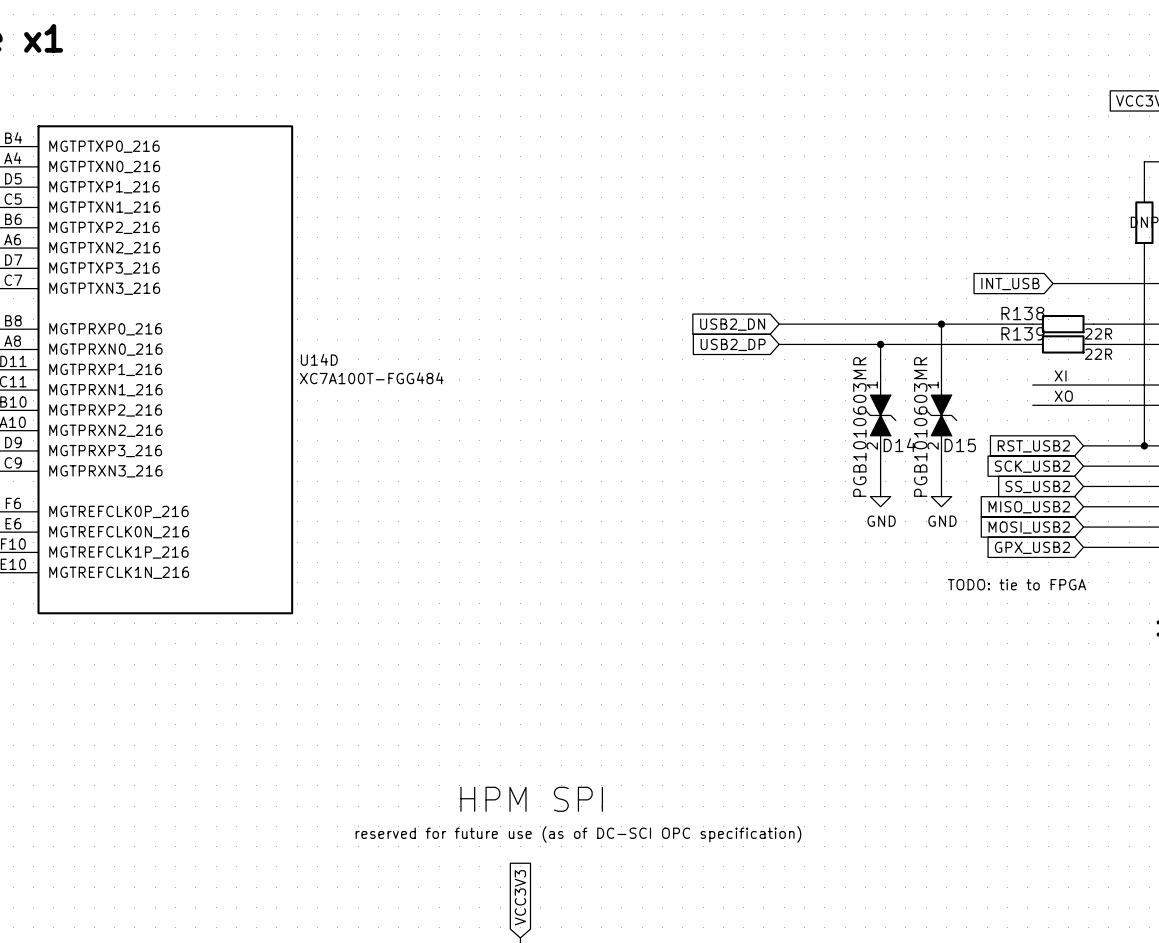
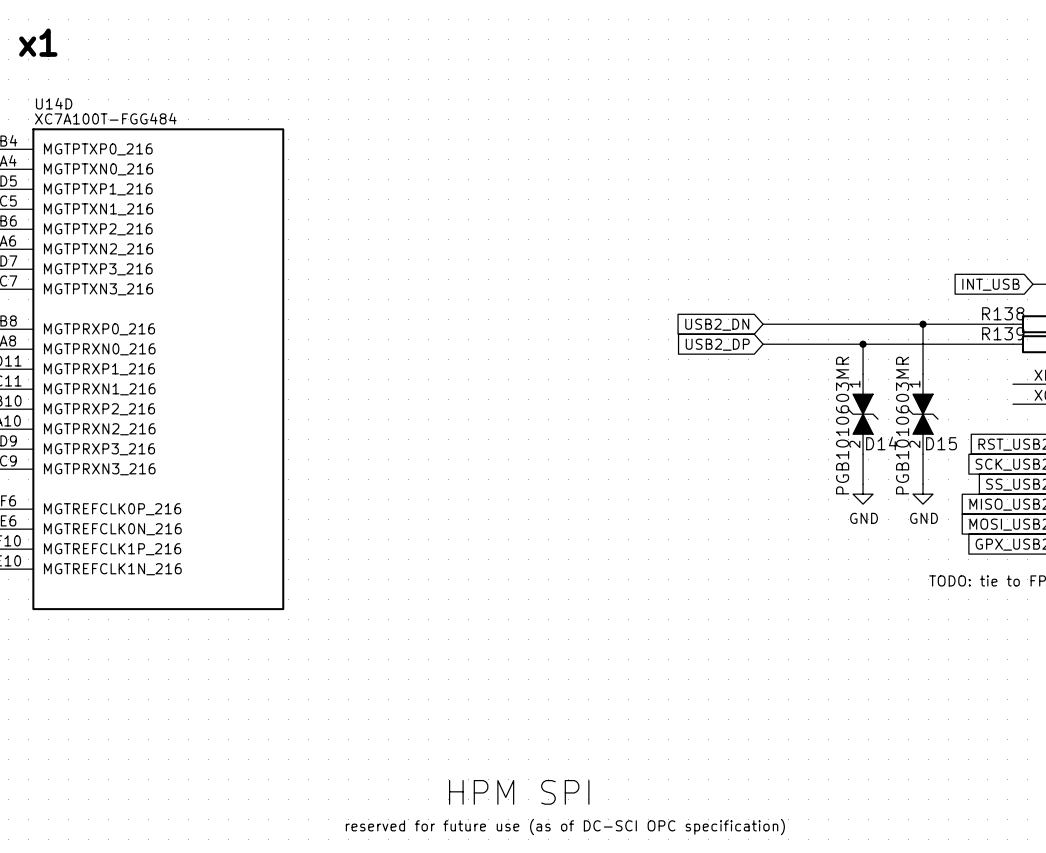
U14D name position: U14D (319, 359) -> U14D (54, 103)
U14D value position: XC7A100T-FGG484 (371, 378) -> XC7A100T-FGG484 (105, 118)

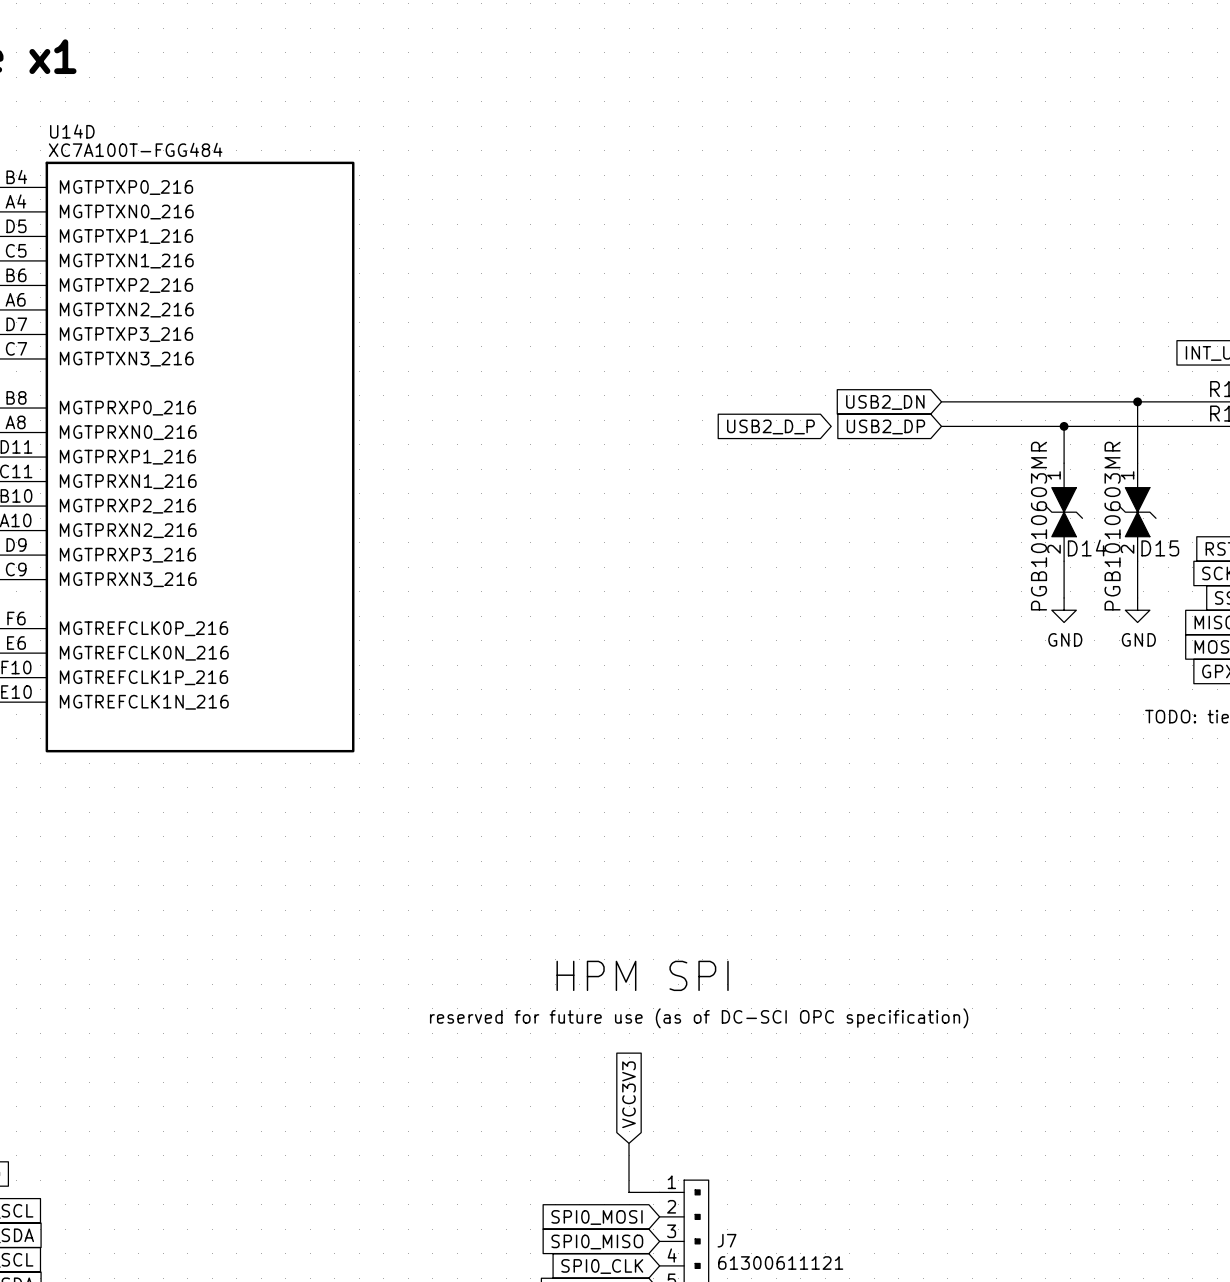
global label: none -> USB2_D_P (770, 426)

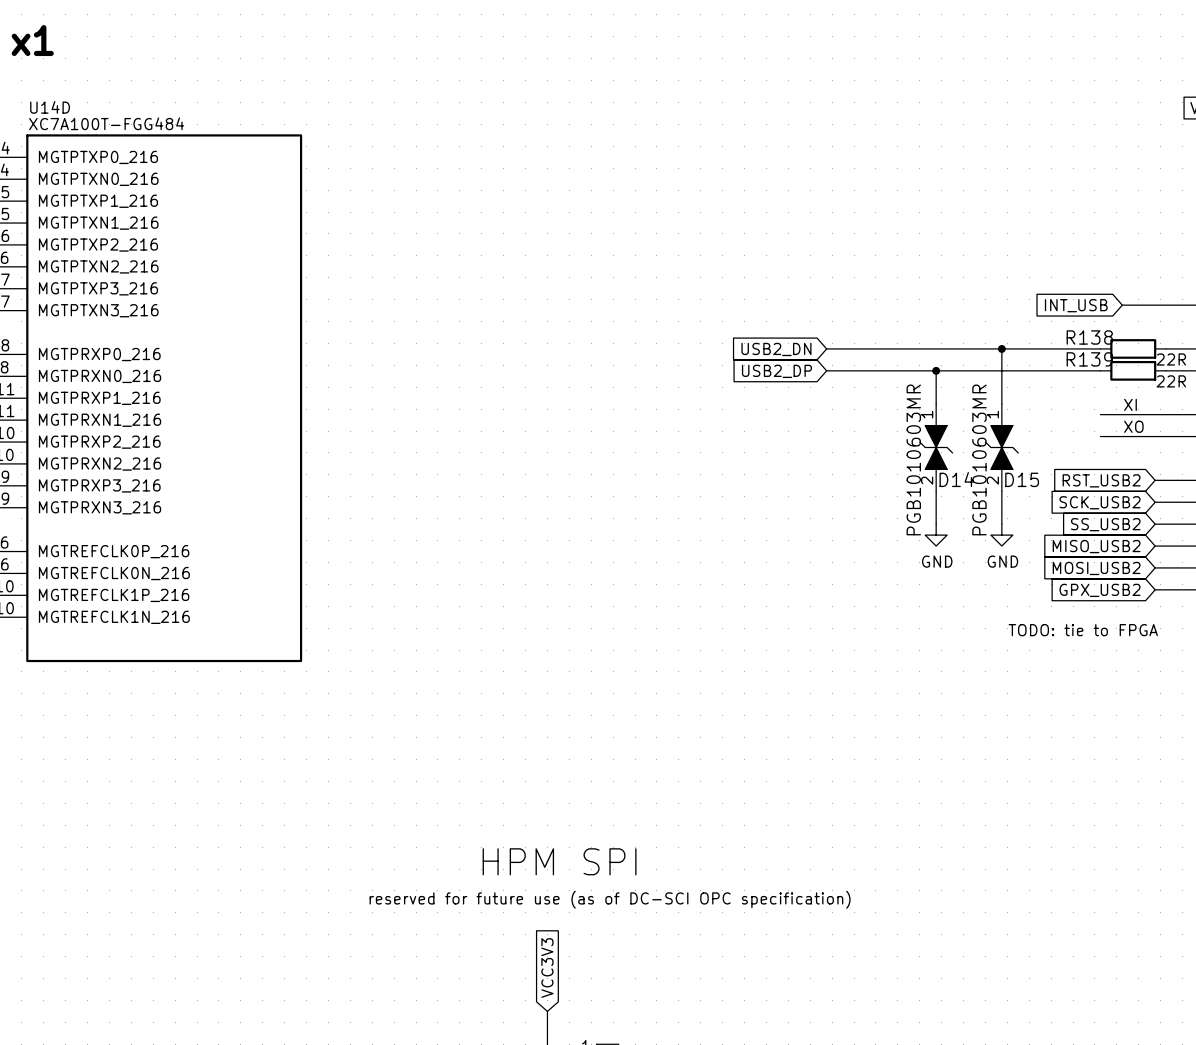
global label: USB2_D_P (770, 426) -> none

